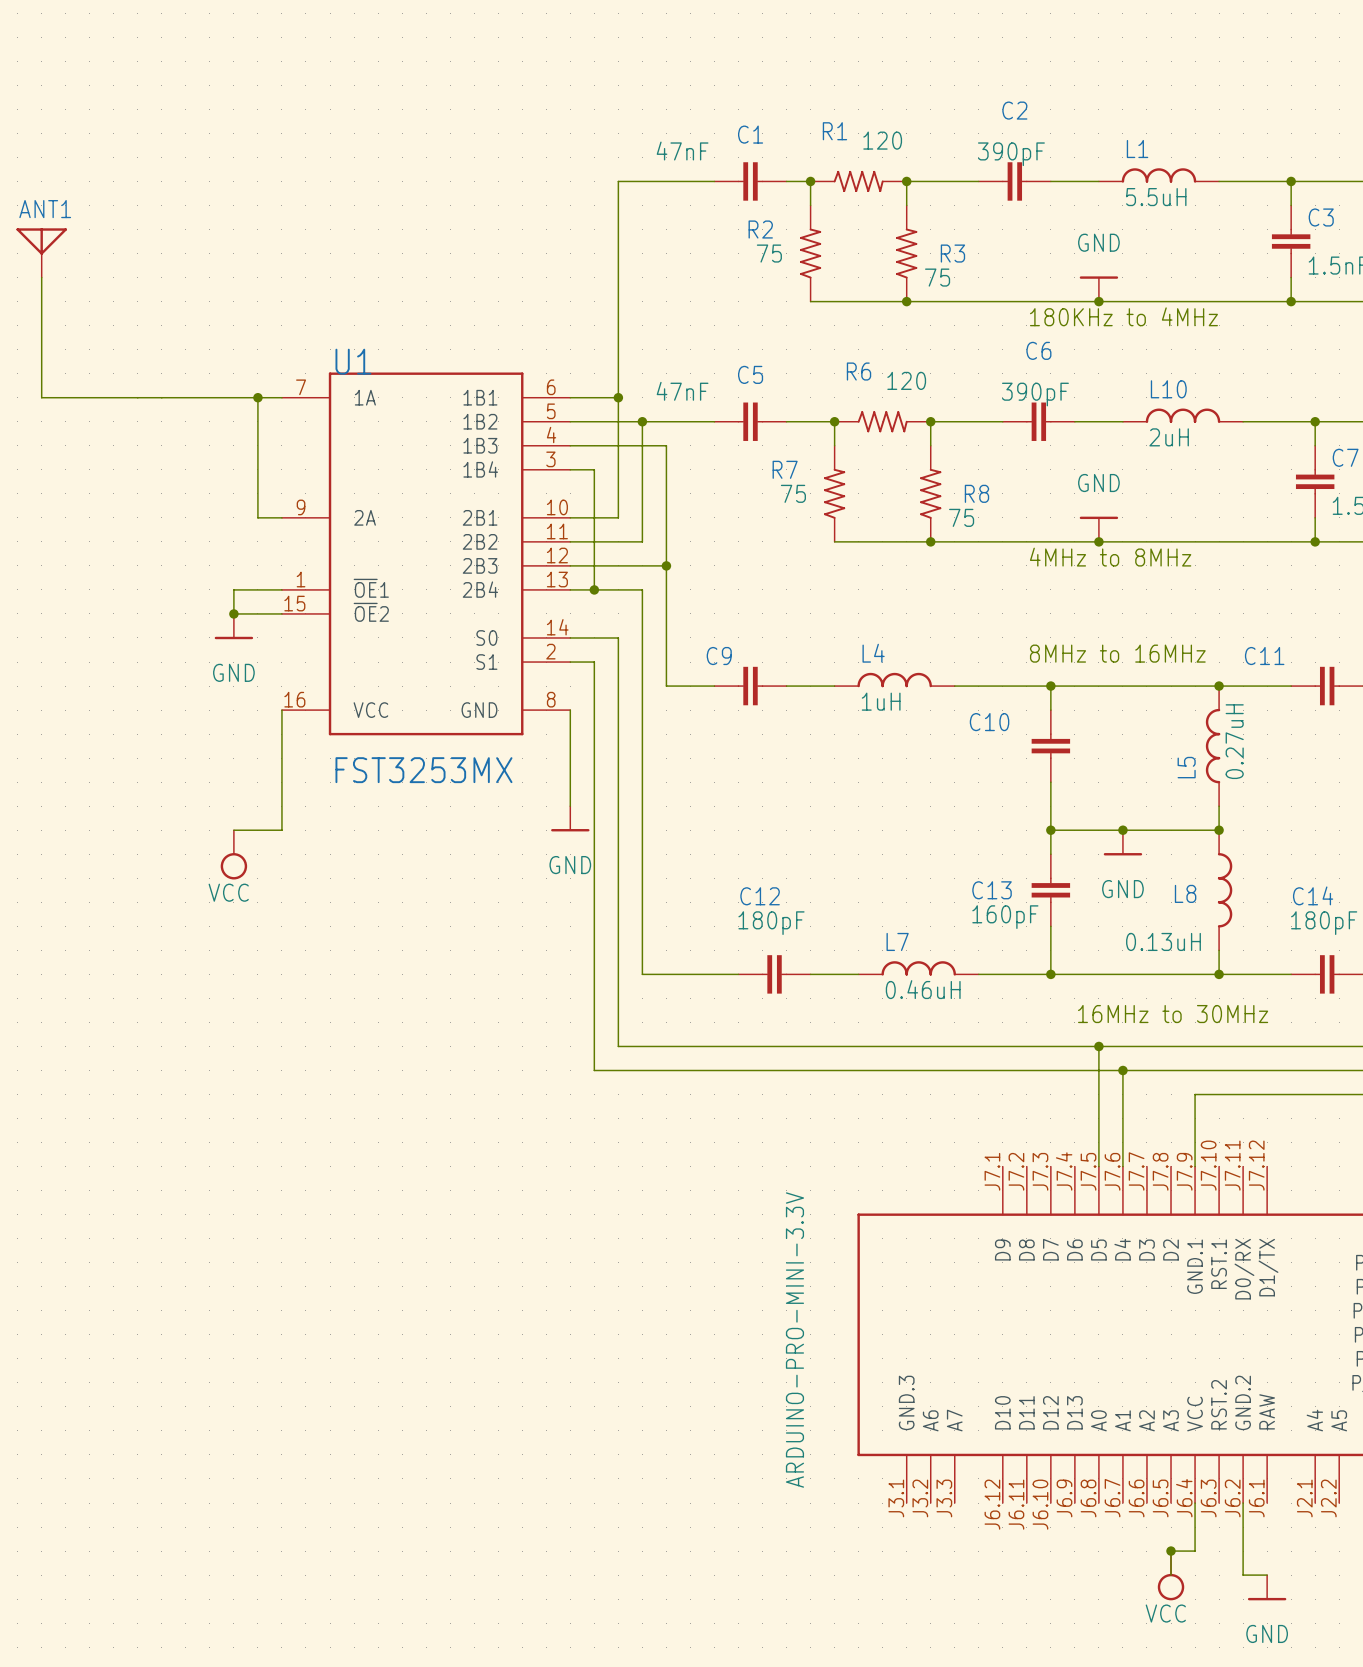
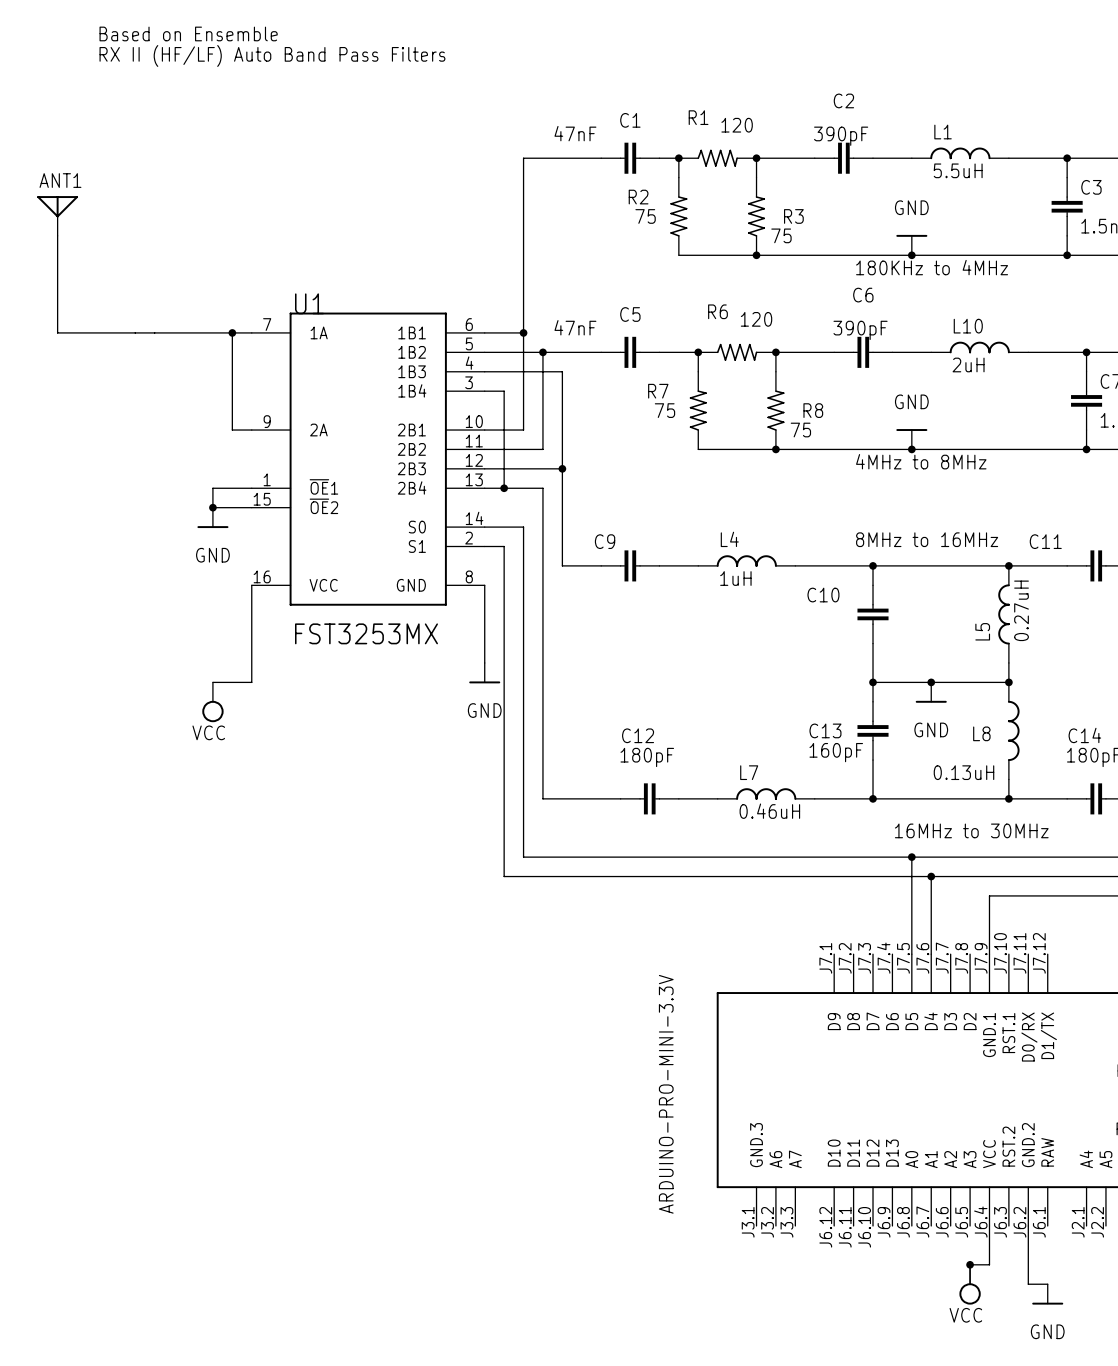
text: none -> Based on Ensemble (188, 33)
text: none -> RX II (HF/LF) Auto Band Pass Filters (272, 55)

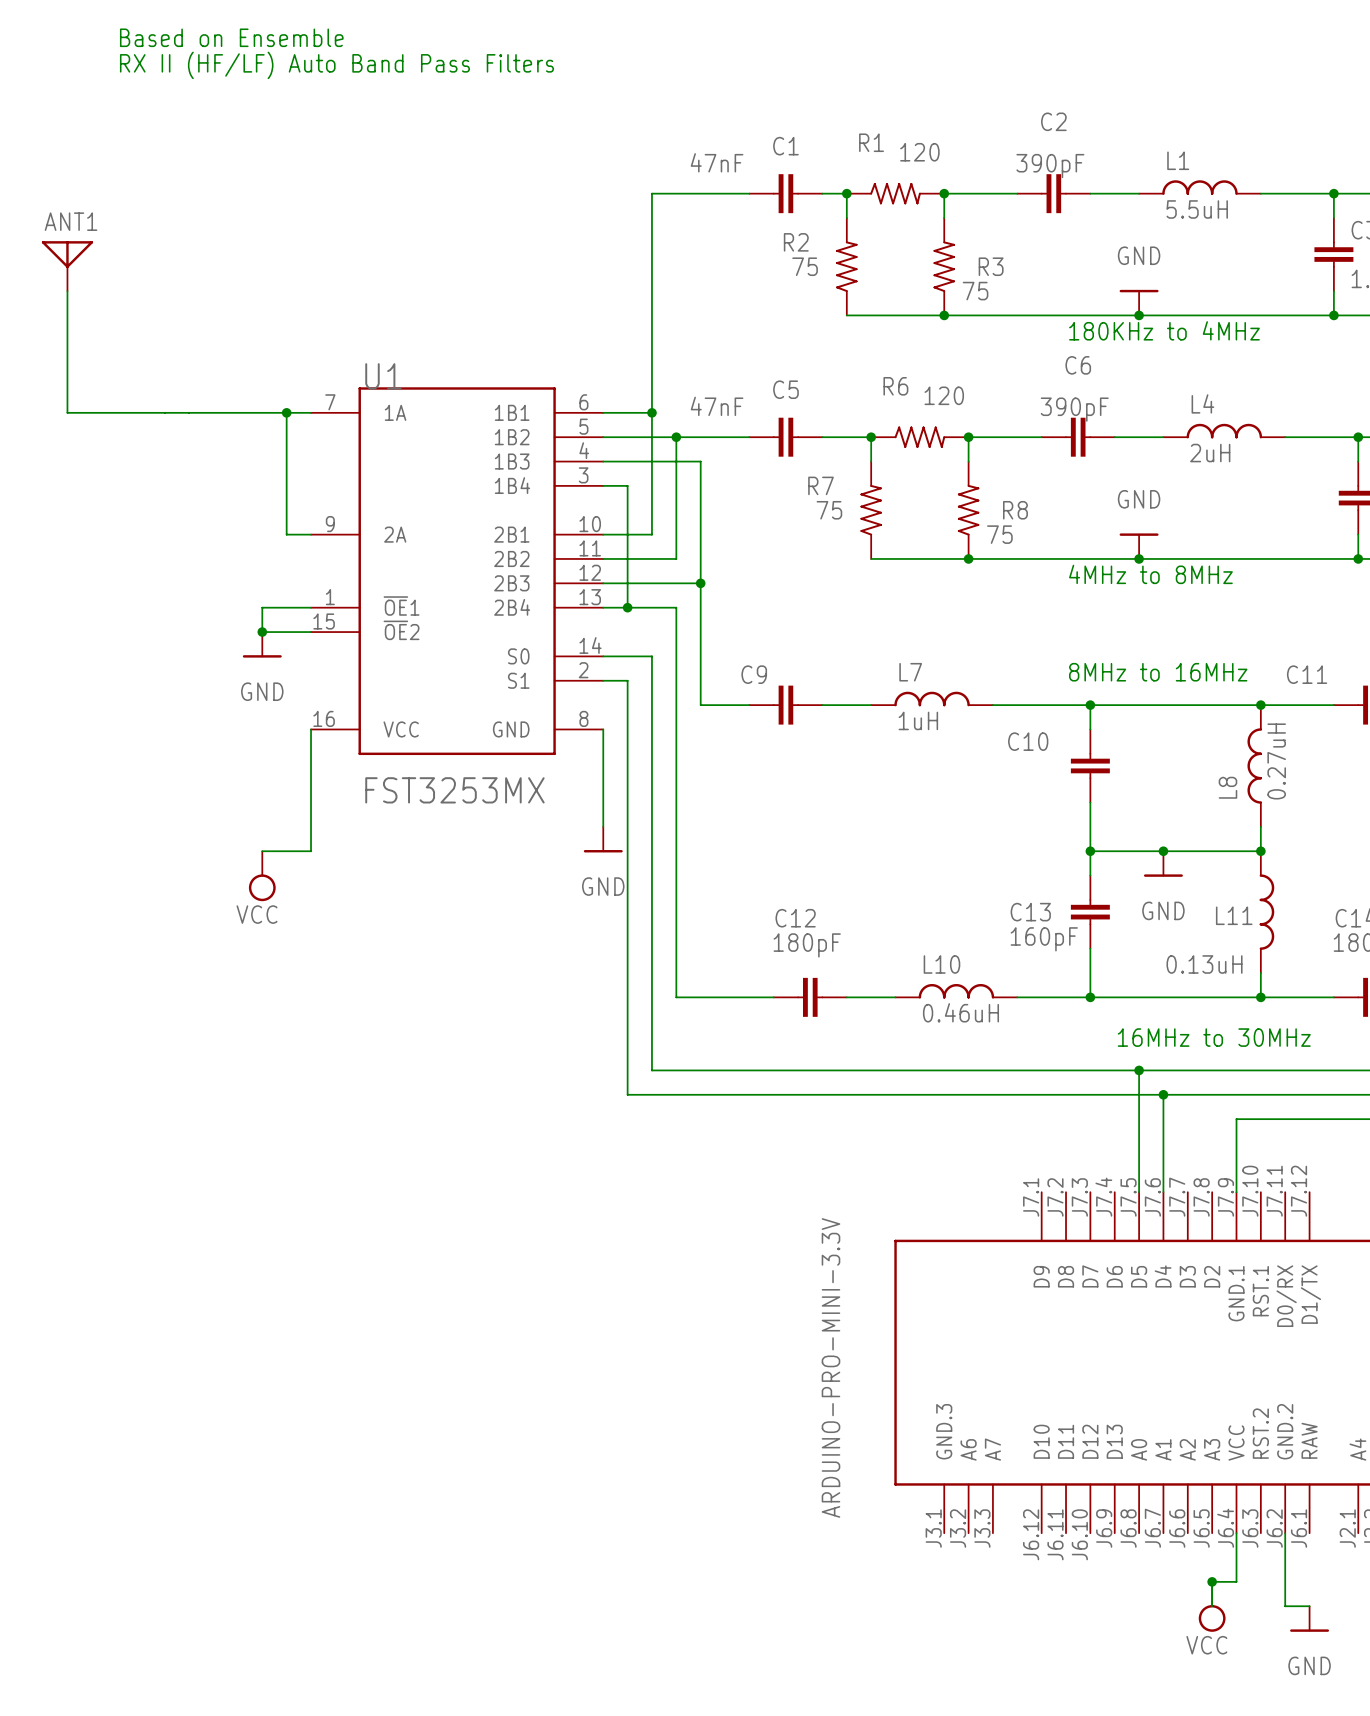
L10 name: L10 (968, 326) -> L4 (1202, 403)
L4 name: L4 (729, 539) -> L7 (910, 672)
L5 name: L5 (982, 631) -> L8 (1227, 787)
L8 name: L8 (981, 733) -> L11 (1234, 915)
L7 name: L7 (749, 772) -> L10 (941, 964)

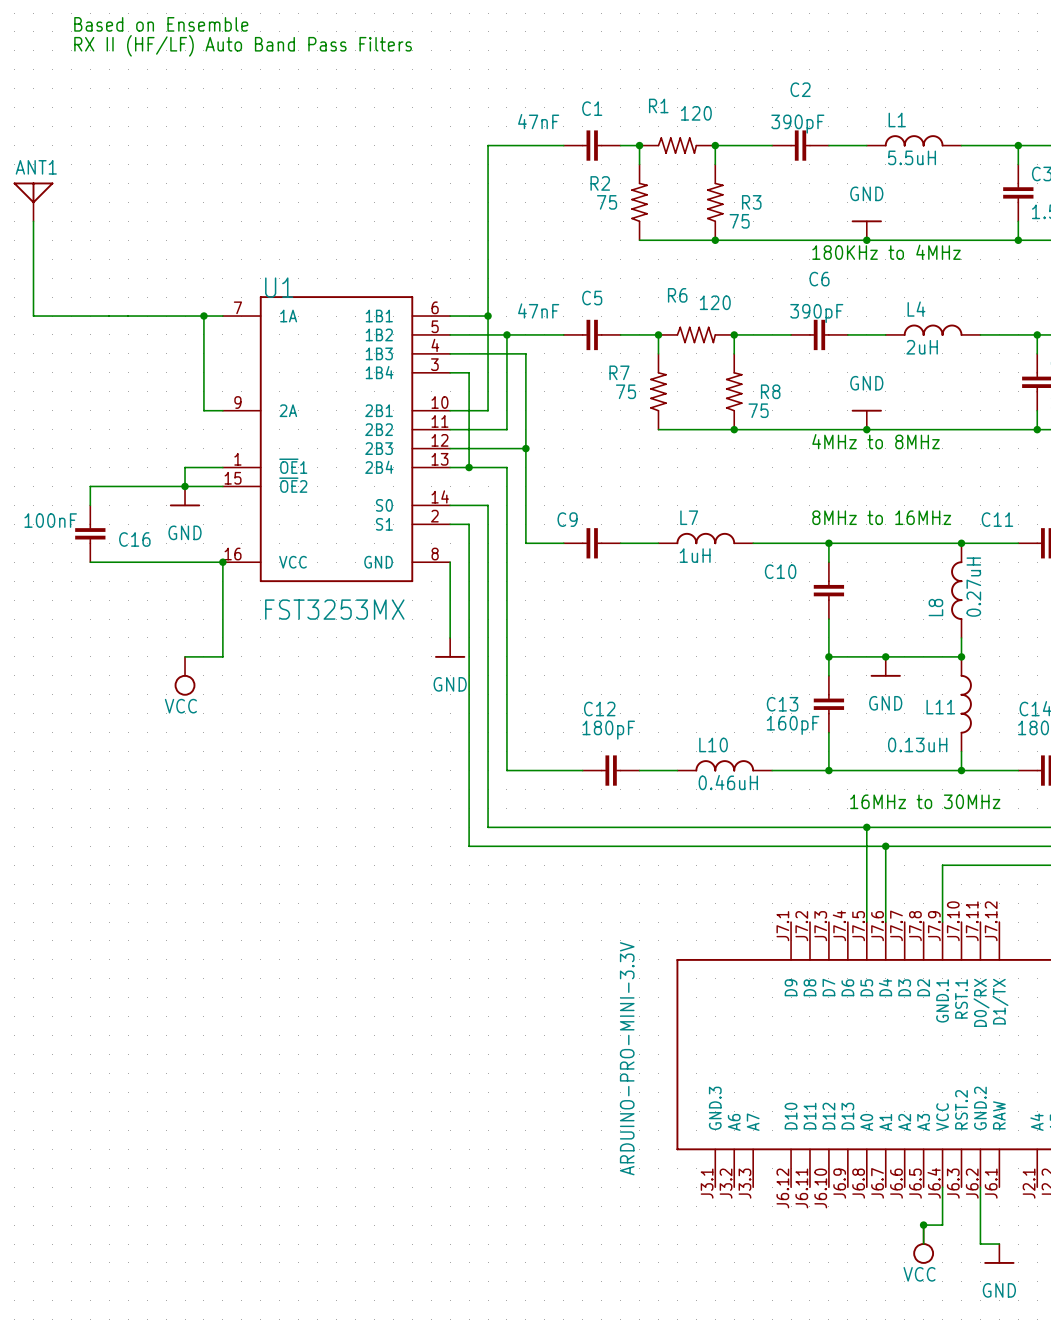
wire: none -> (185, 486) (90, 486) (90, 505)
C16: none -> 100nF (90, 533)
wire: none -> (90, 562) (222, 562)
junction: none -> (222, 562)

